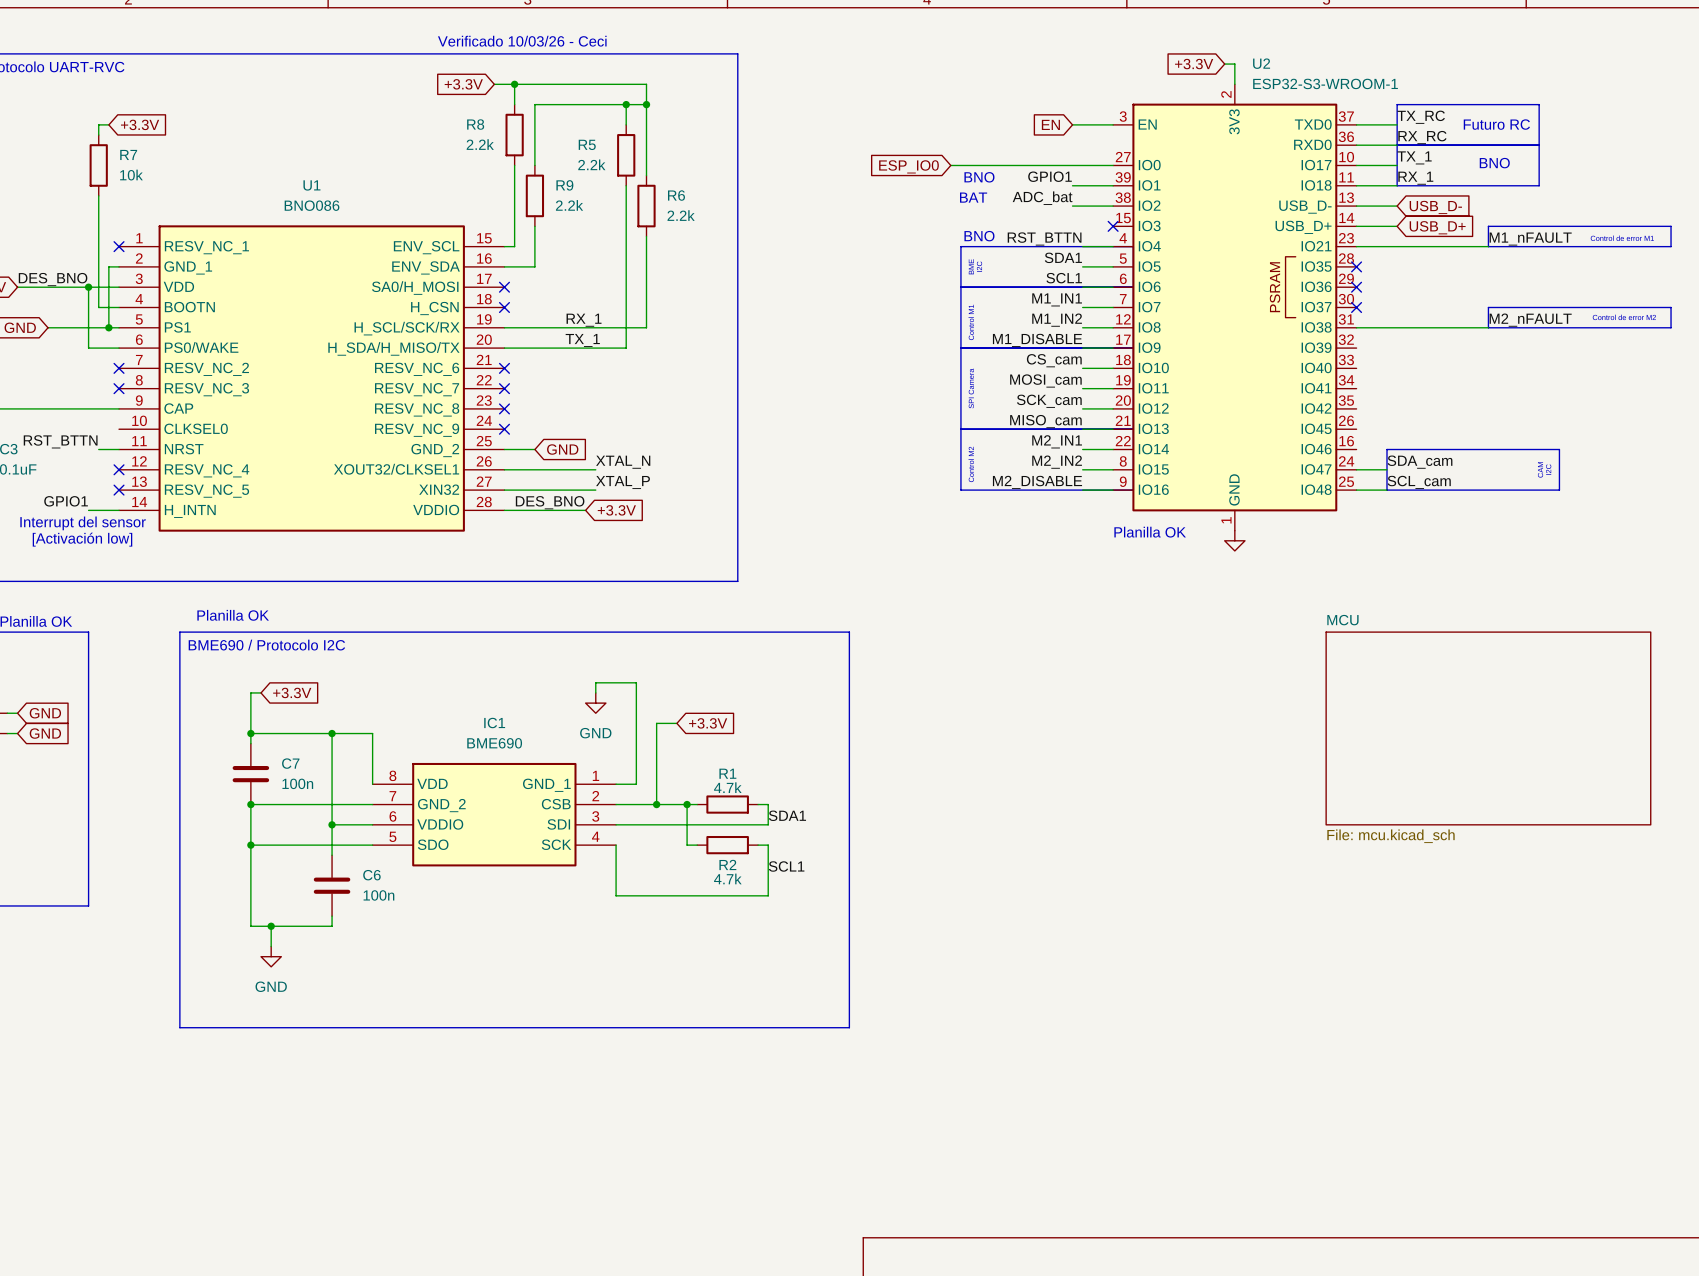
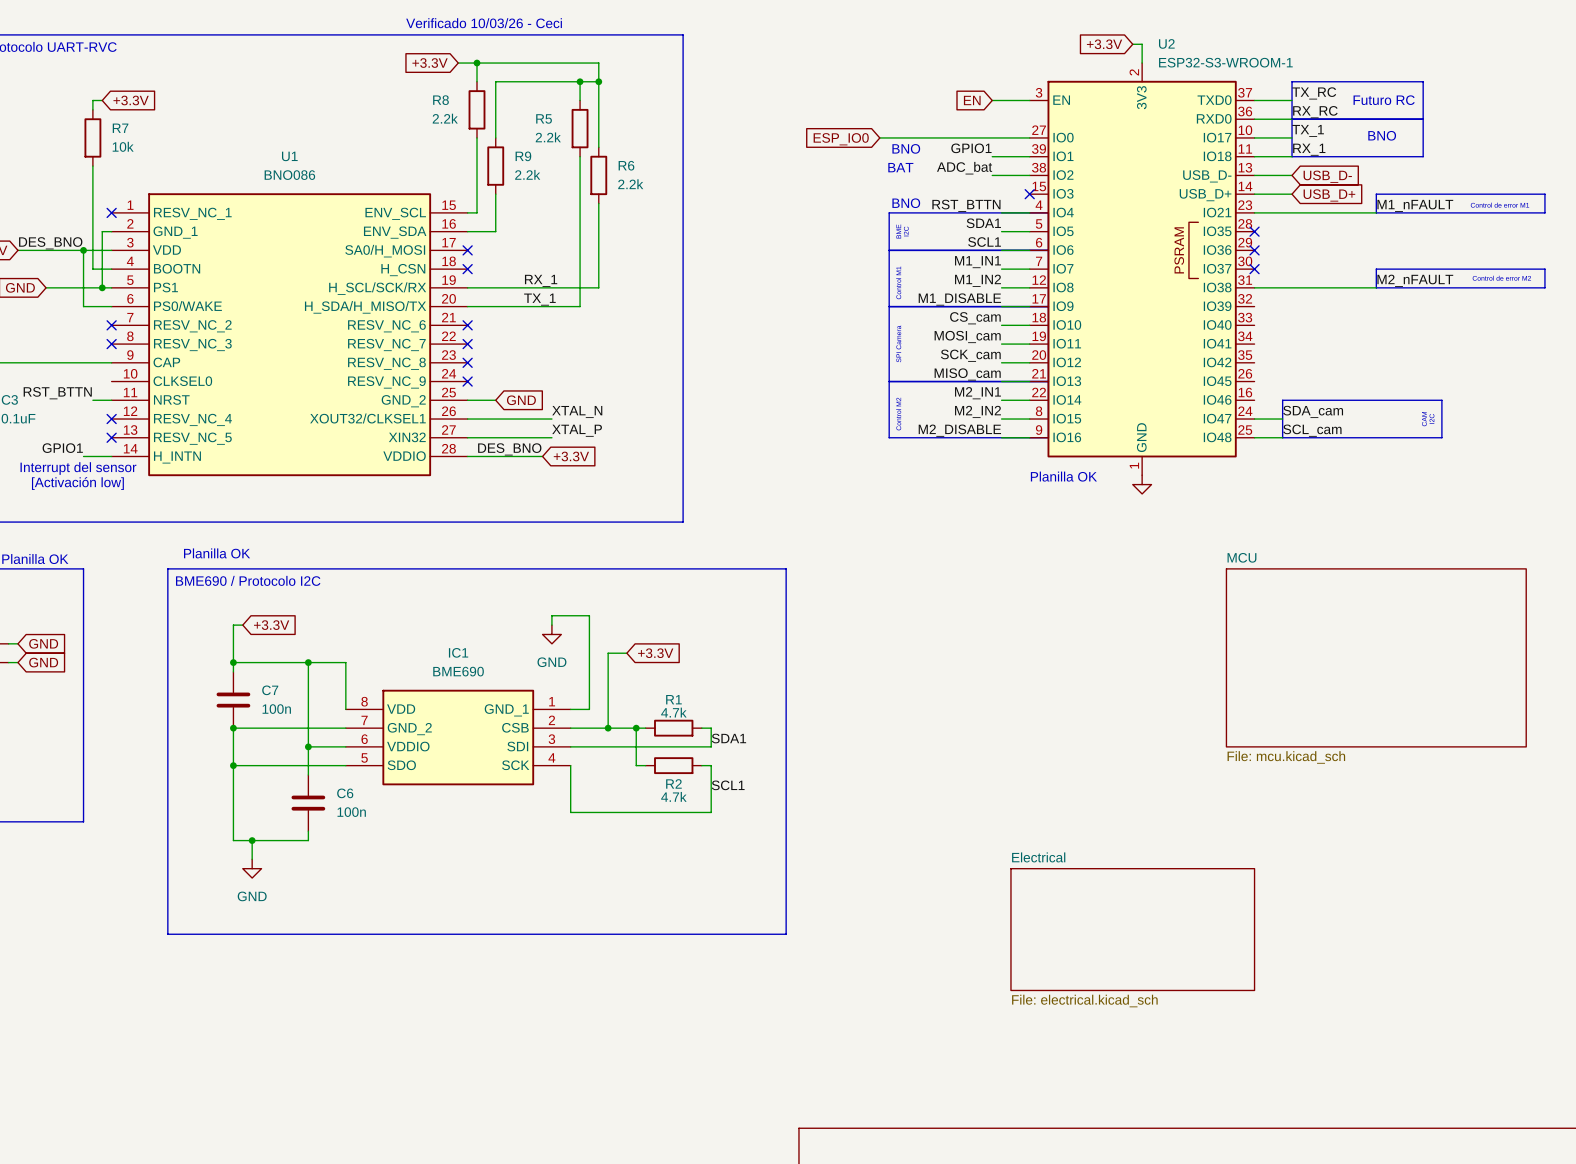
sheet Electrical: none -> File: electrical.kicad_sch (1132, 929)

